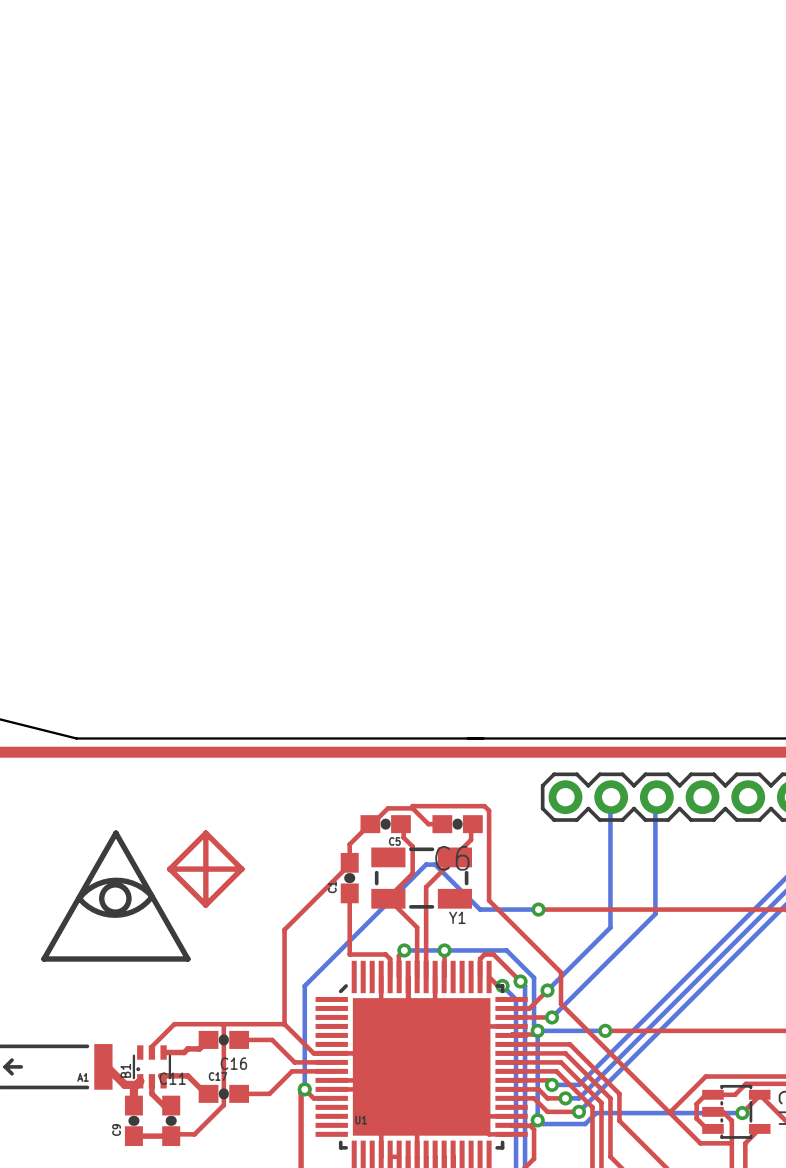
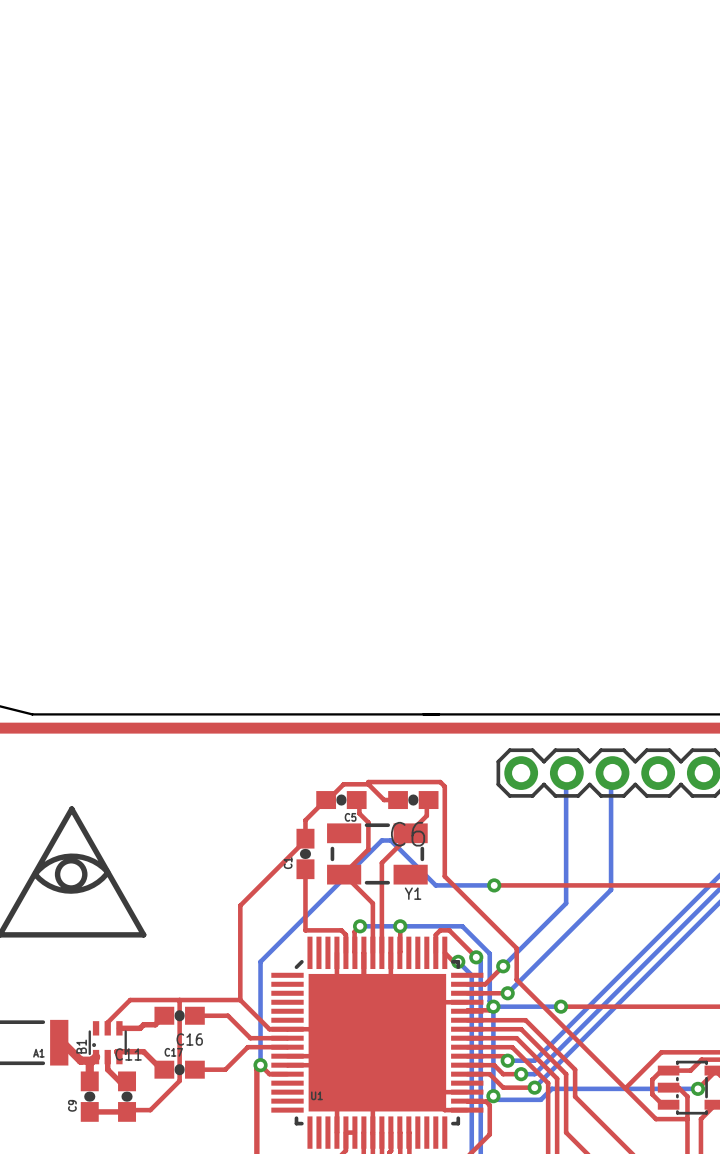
top track: (205, 833) (169, 869) -> none
top track: (205, 833) (241, 869) -> none
top track: (205, 833) (205, 905) -> none
top track: (169, 869) (205, 905) -> none
top track: (169, 869) (241, 869) -> none
top track: (241, 869) (205, 905) -> none

